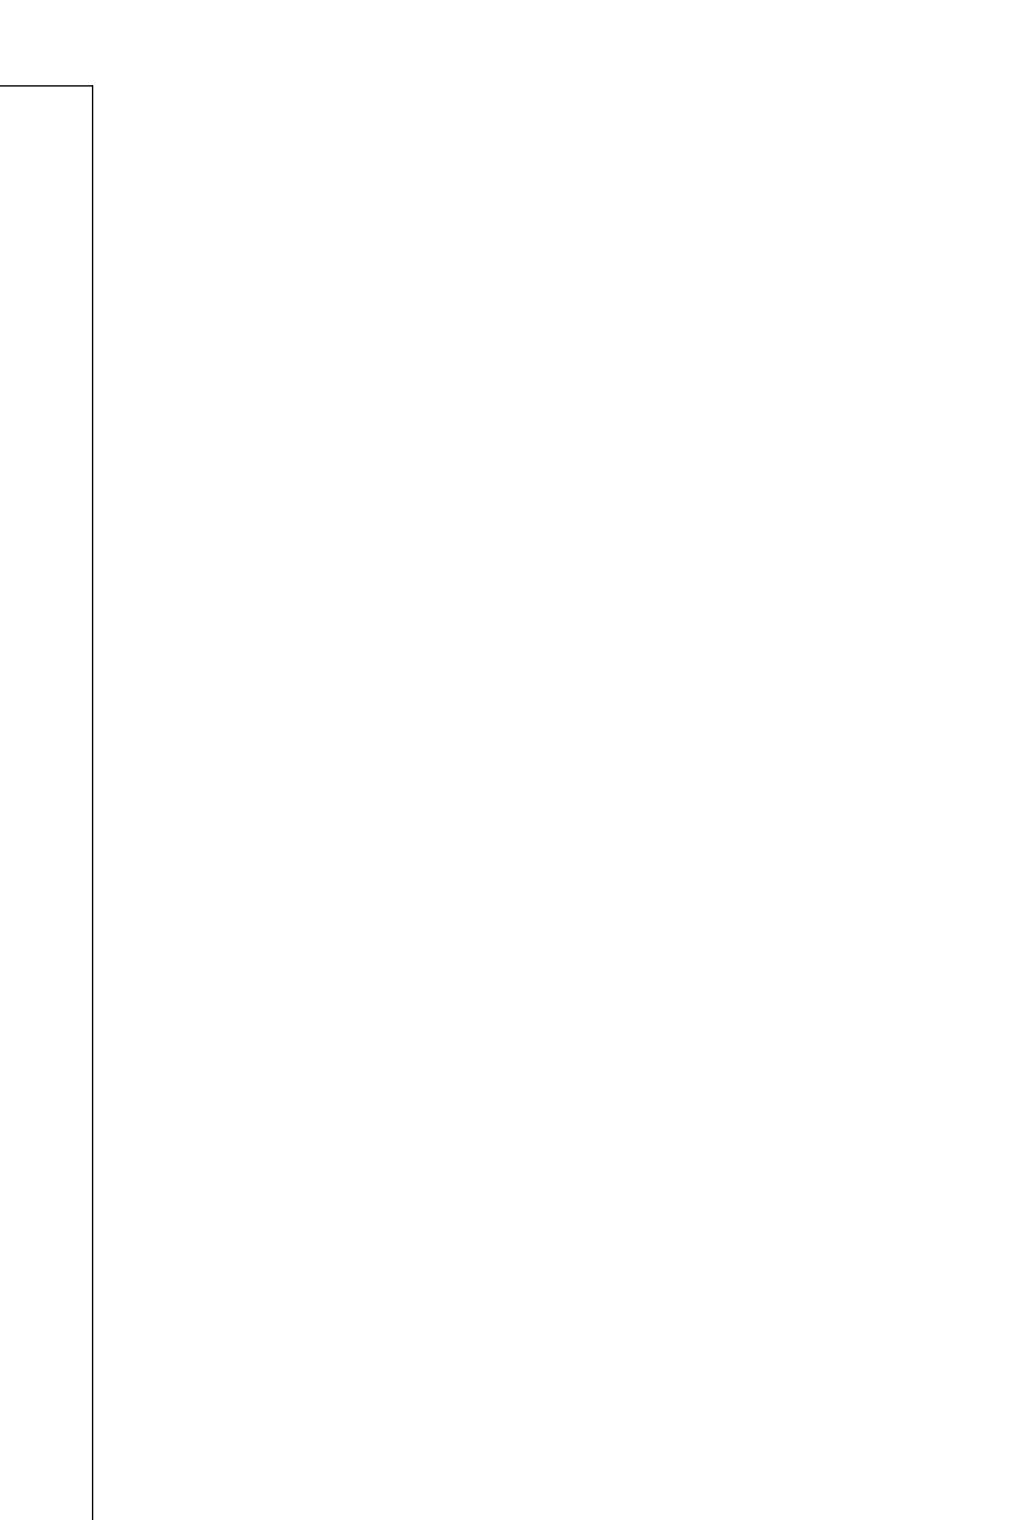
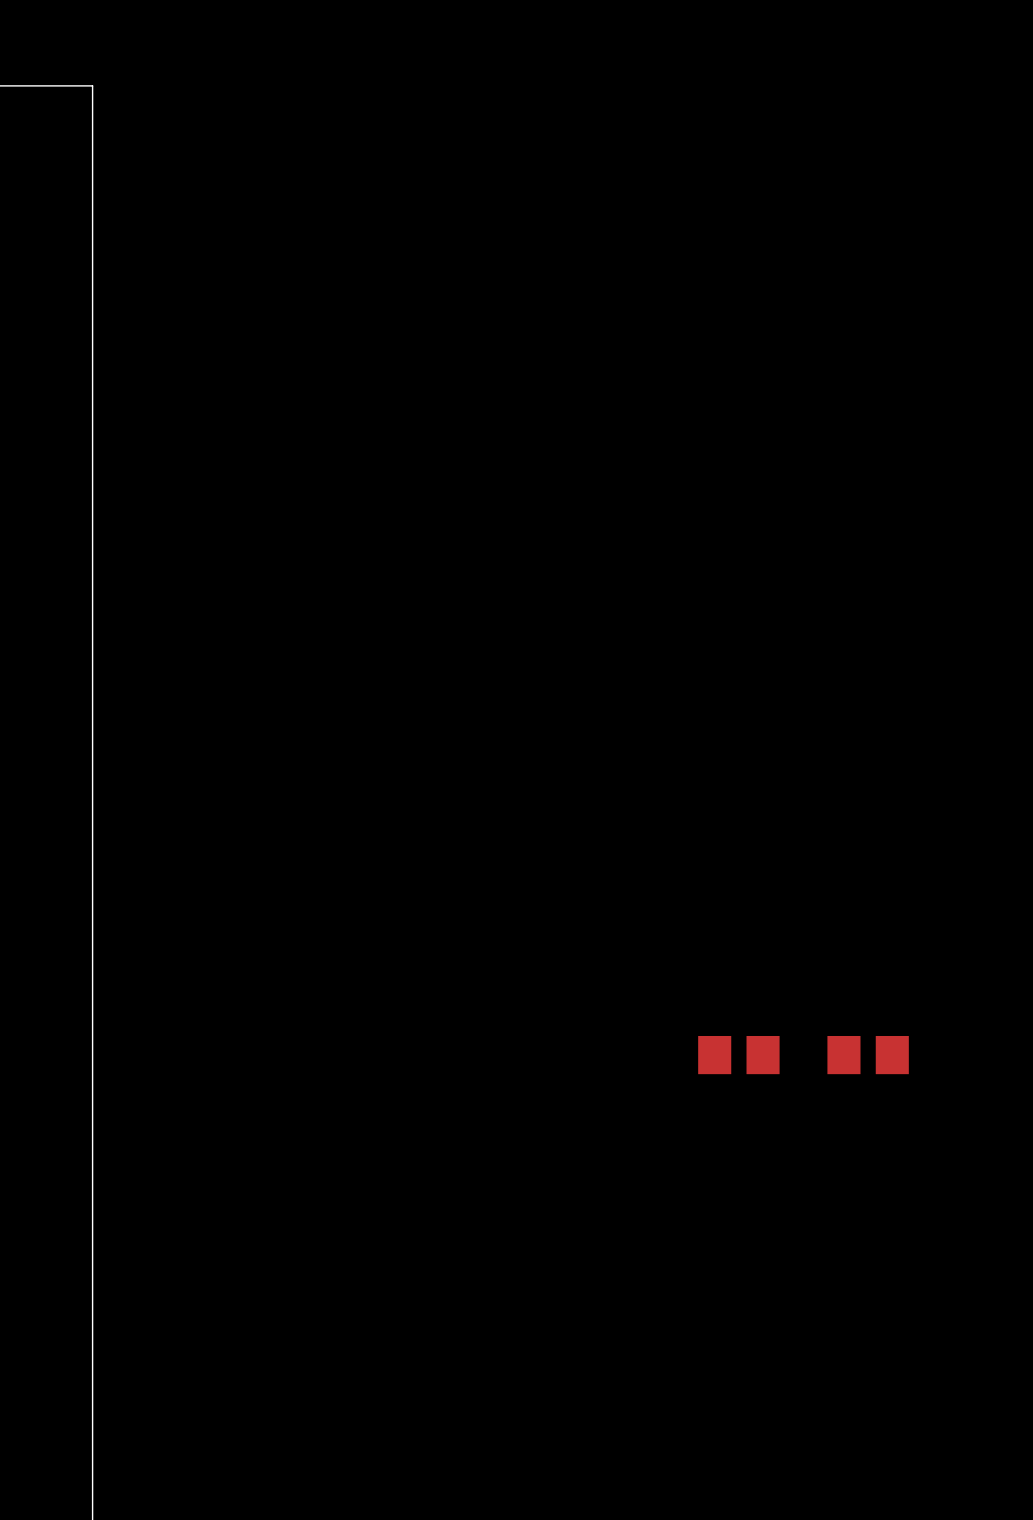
part: none -> (738, 1055)
part: none -> (868, 1055)

